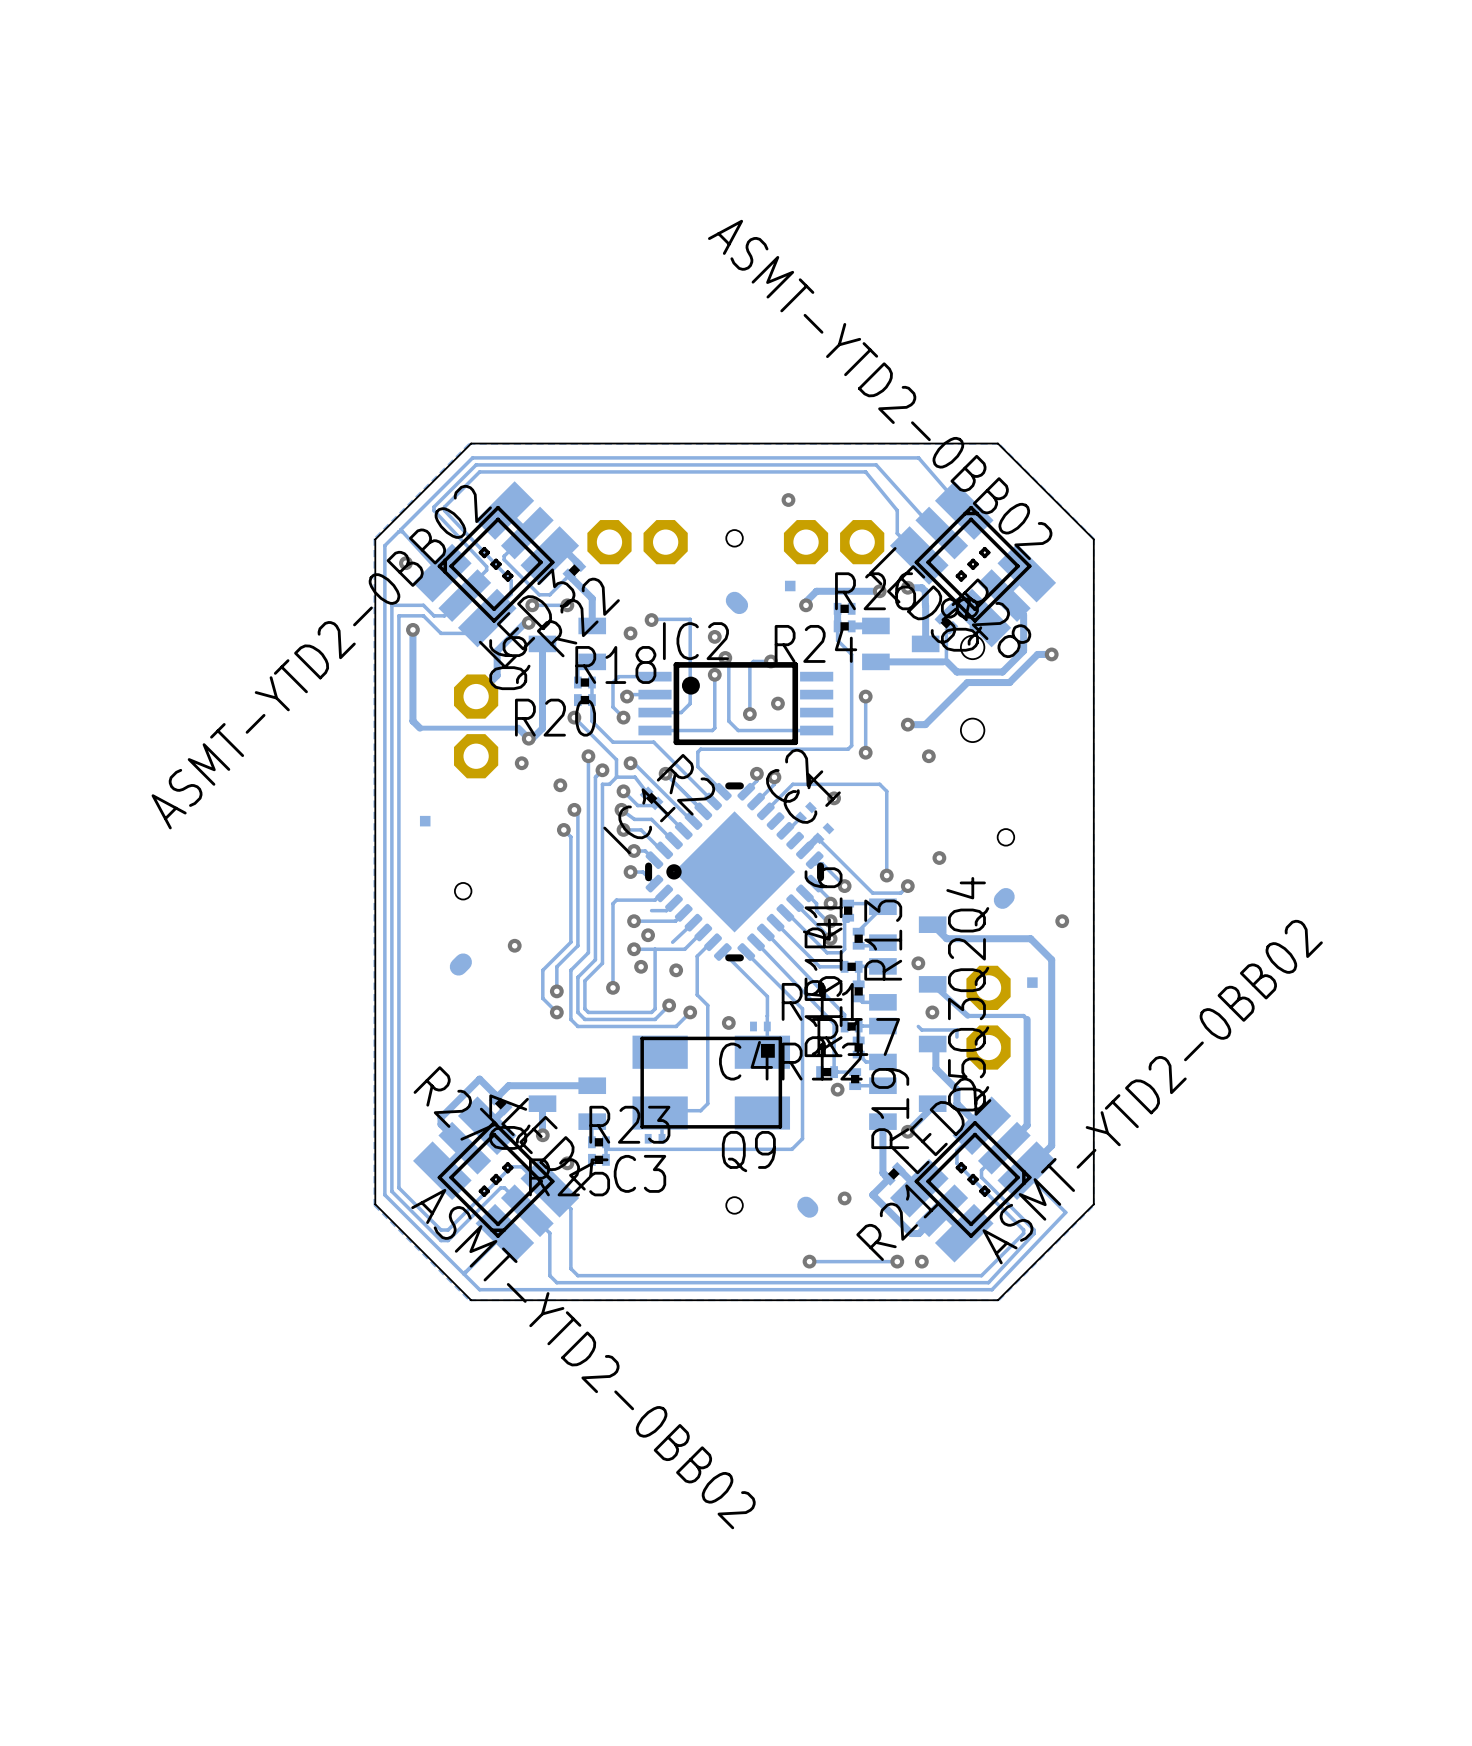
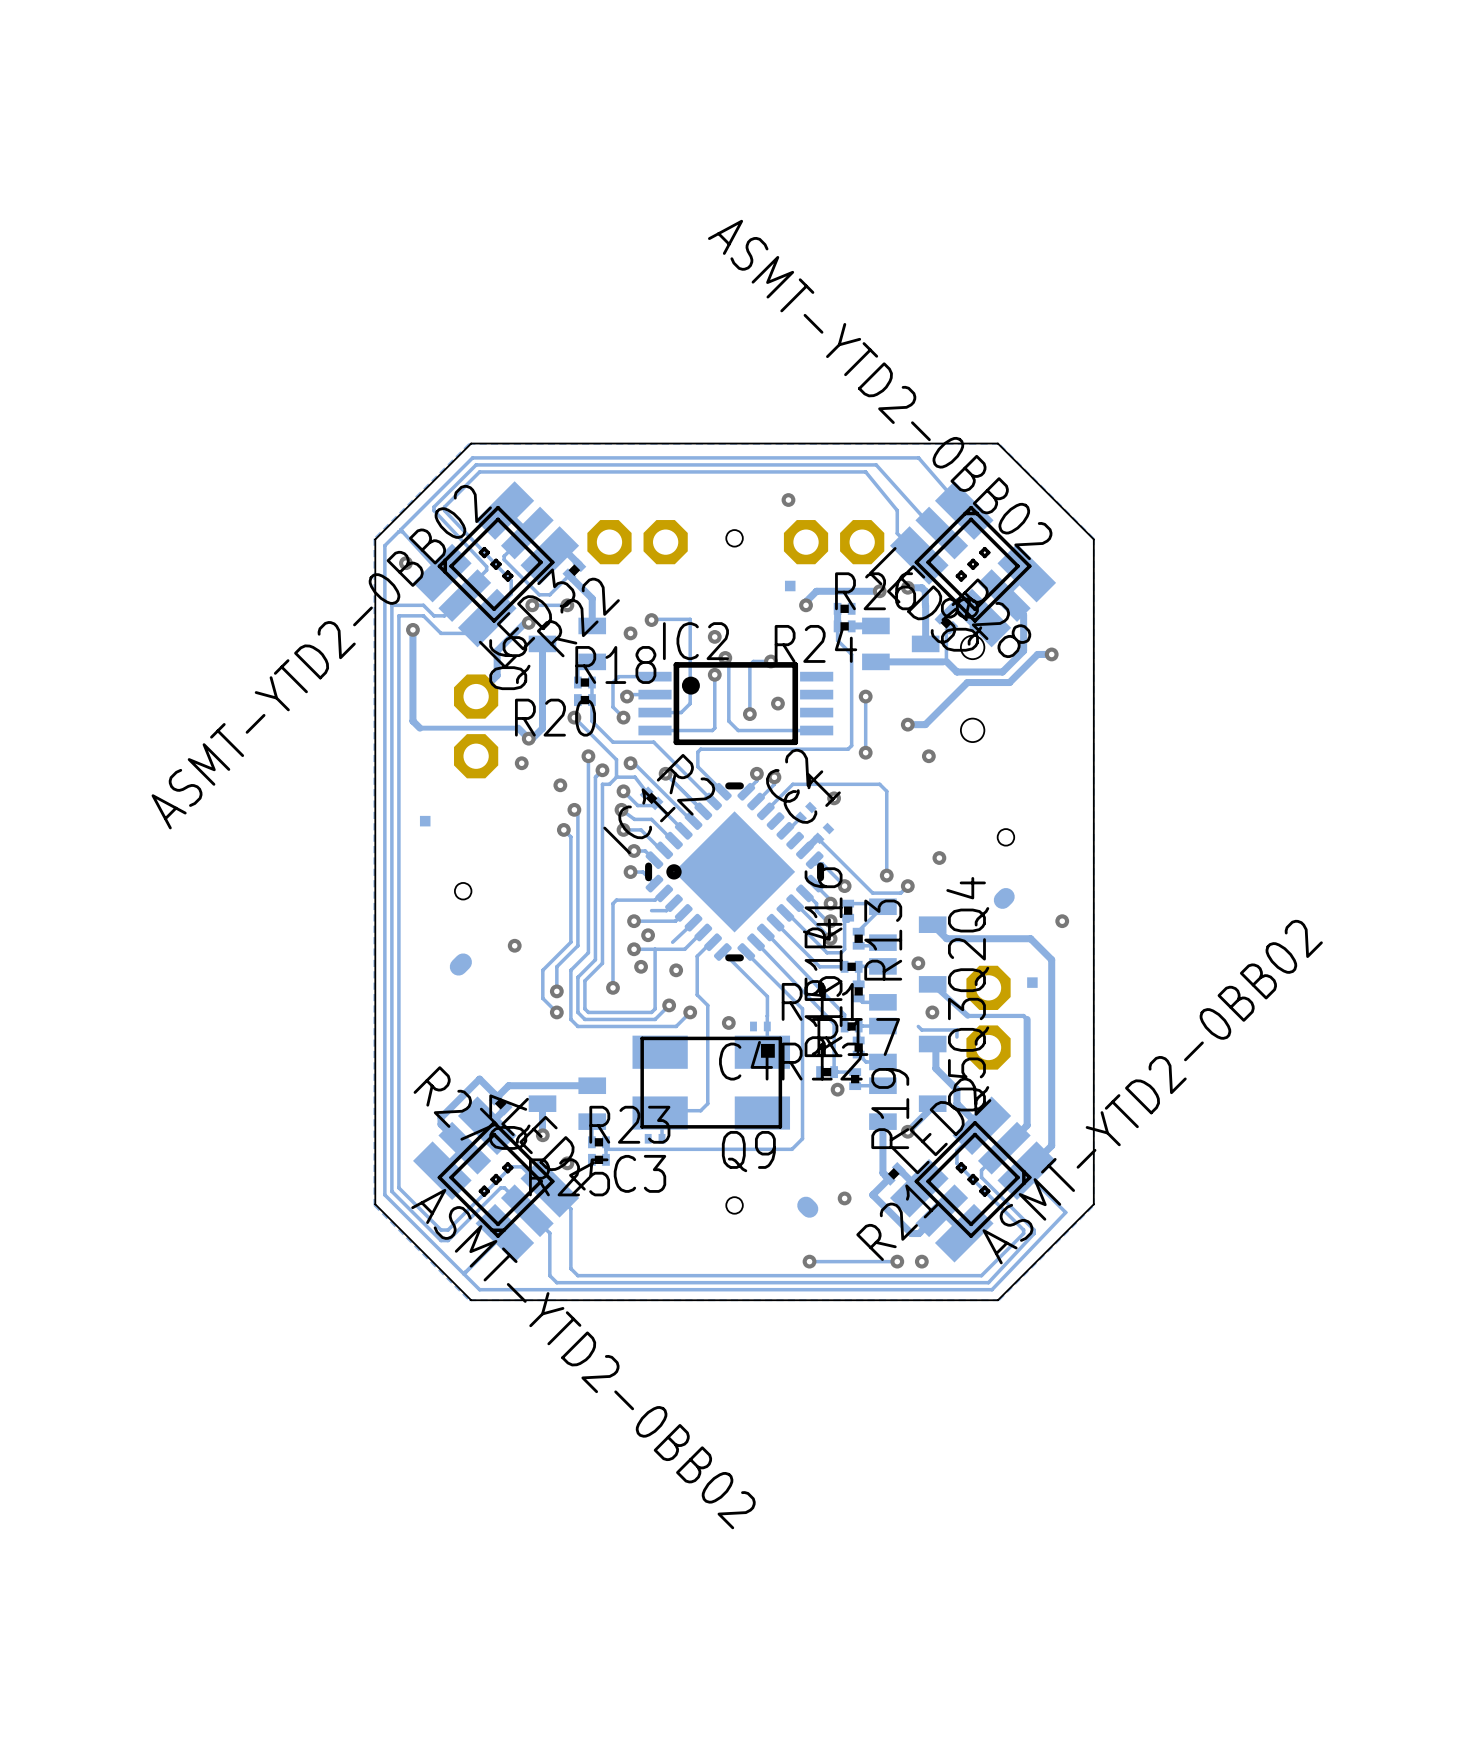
track: (734, 600) (739, 605) -> none

